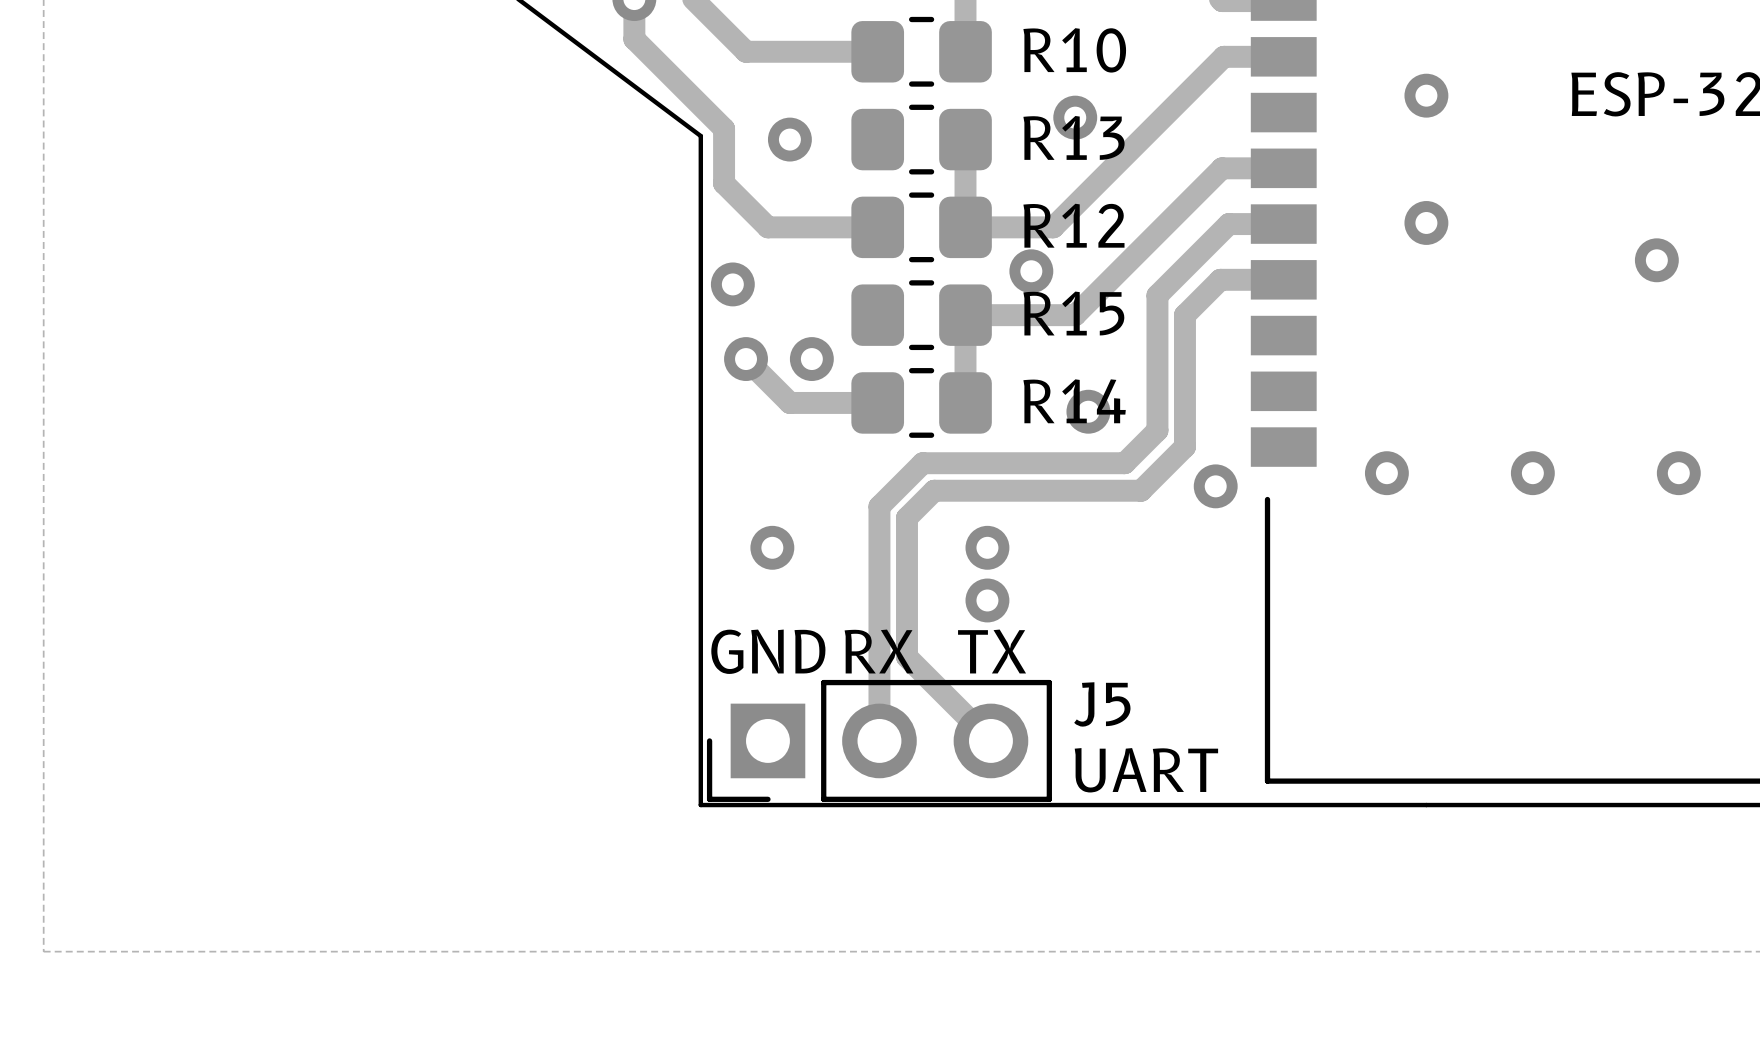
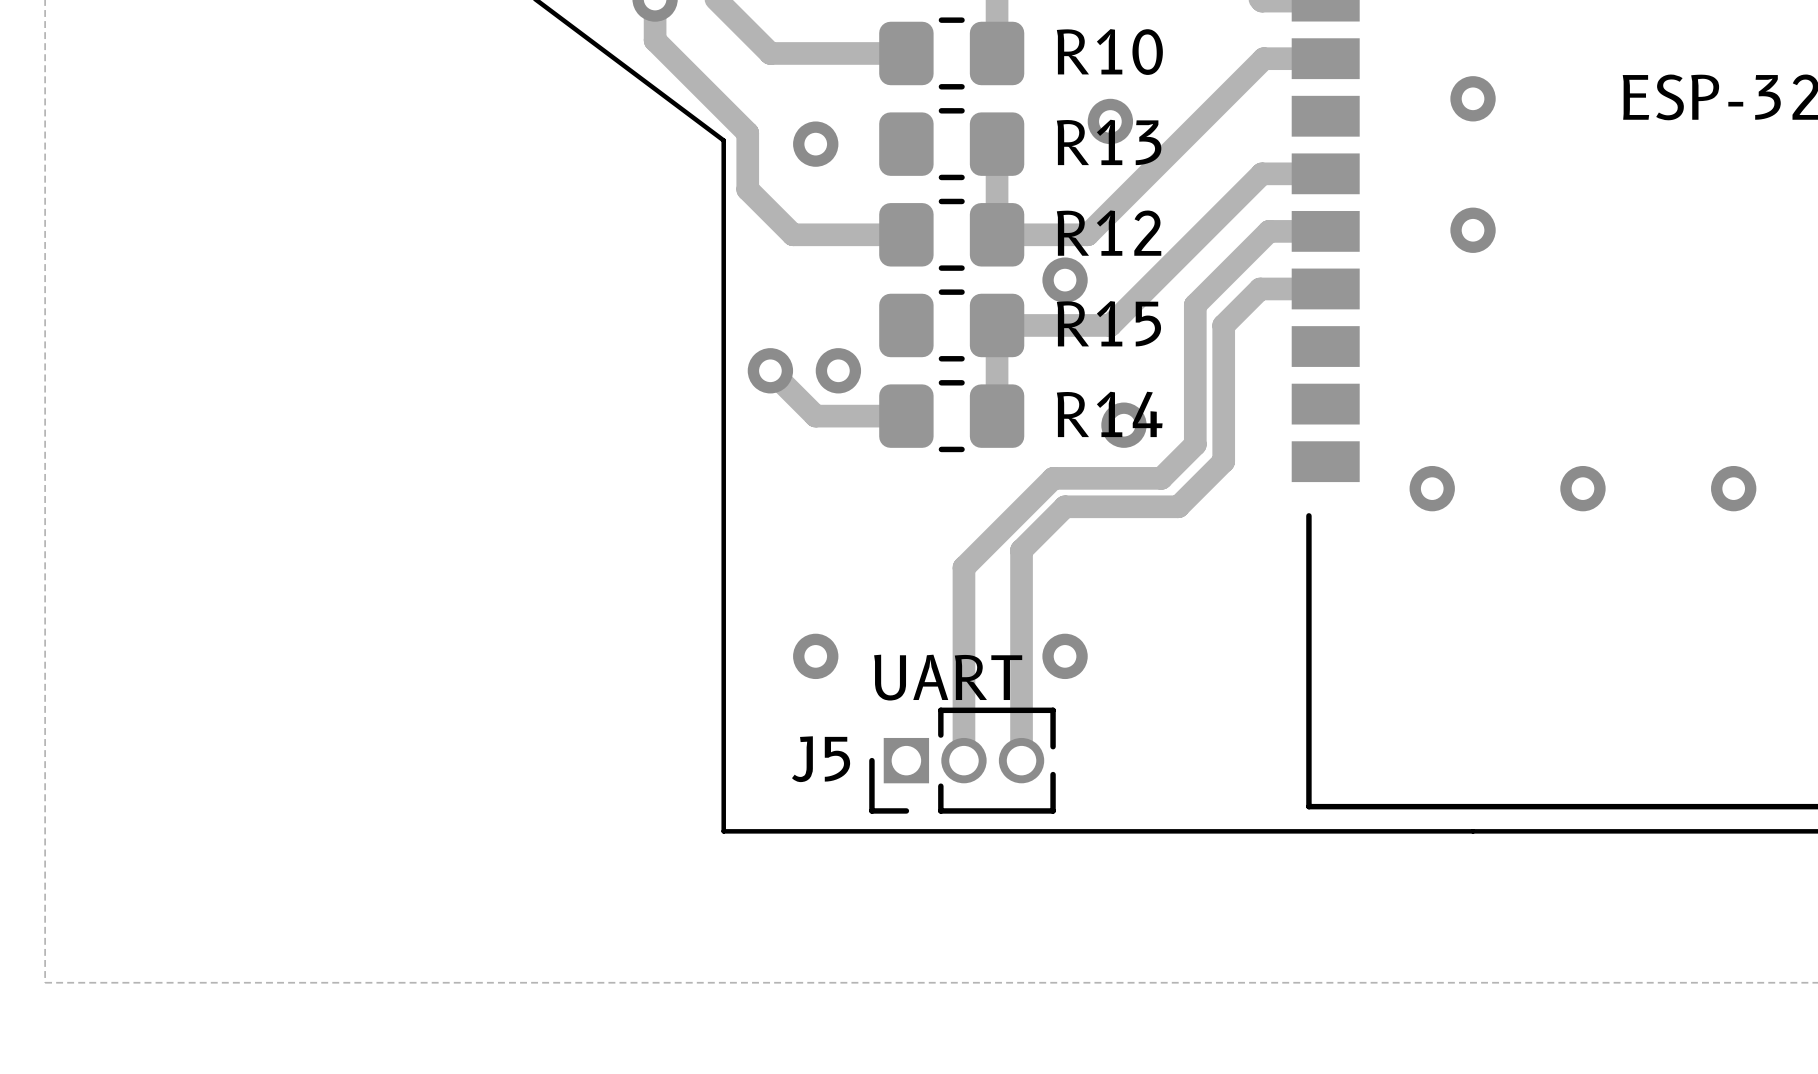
via: (1656, 260) -> none
via: (732, 284) -> none
track: (1019, 463) (922, 463) (879, 506) (879, 740) -> (1053, 478) (963, 567) (963, 760)
via: (1215, 486) -> none
track: (1031, 490) (934, 490) (906, 517) (906, 656) (990, 740) -> (1065, 506) (1021, 550) (1021, 760)
via position: (772, 547) -> (815, 656)
via: (987, 547) -> none
via: (987, 600) -> none
via: none -> (1065, 656)
J5 footprint: [706, 679, 1052, 802] -> [869, 707, 1056, 814]
J5 name position: J5 (1102, 704) -> J5 (821, 759)

